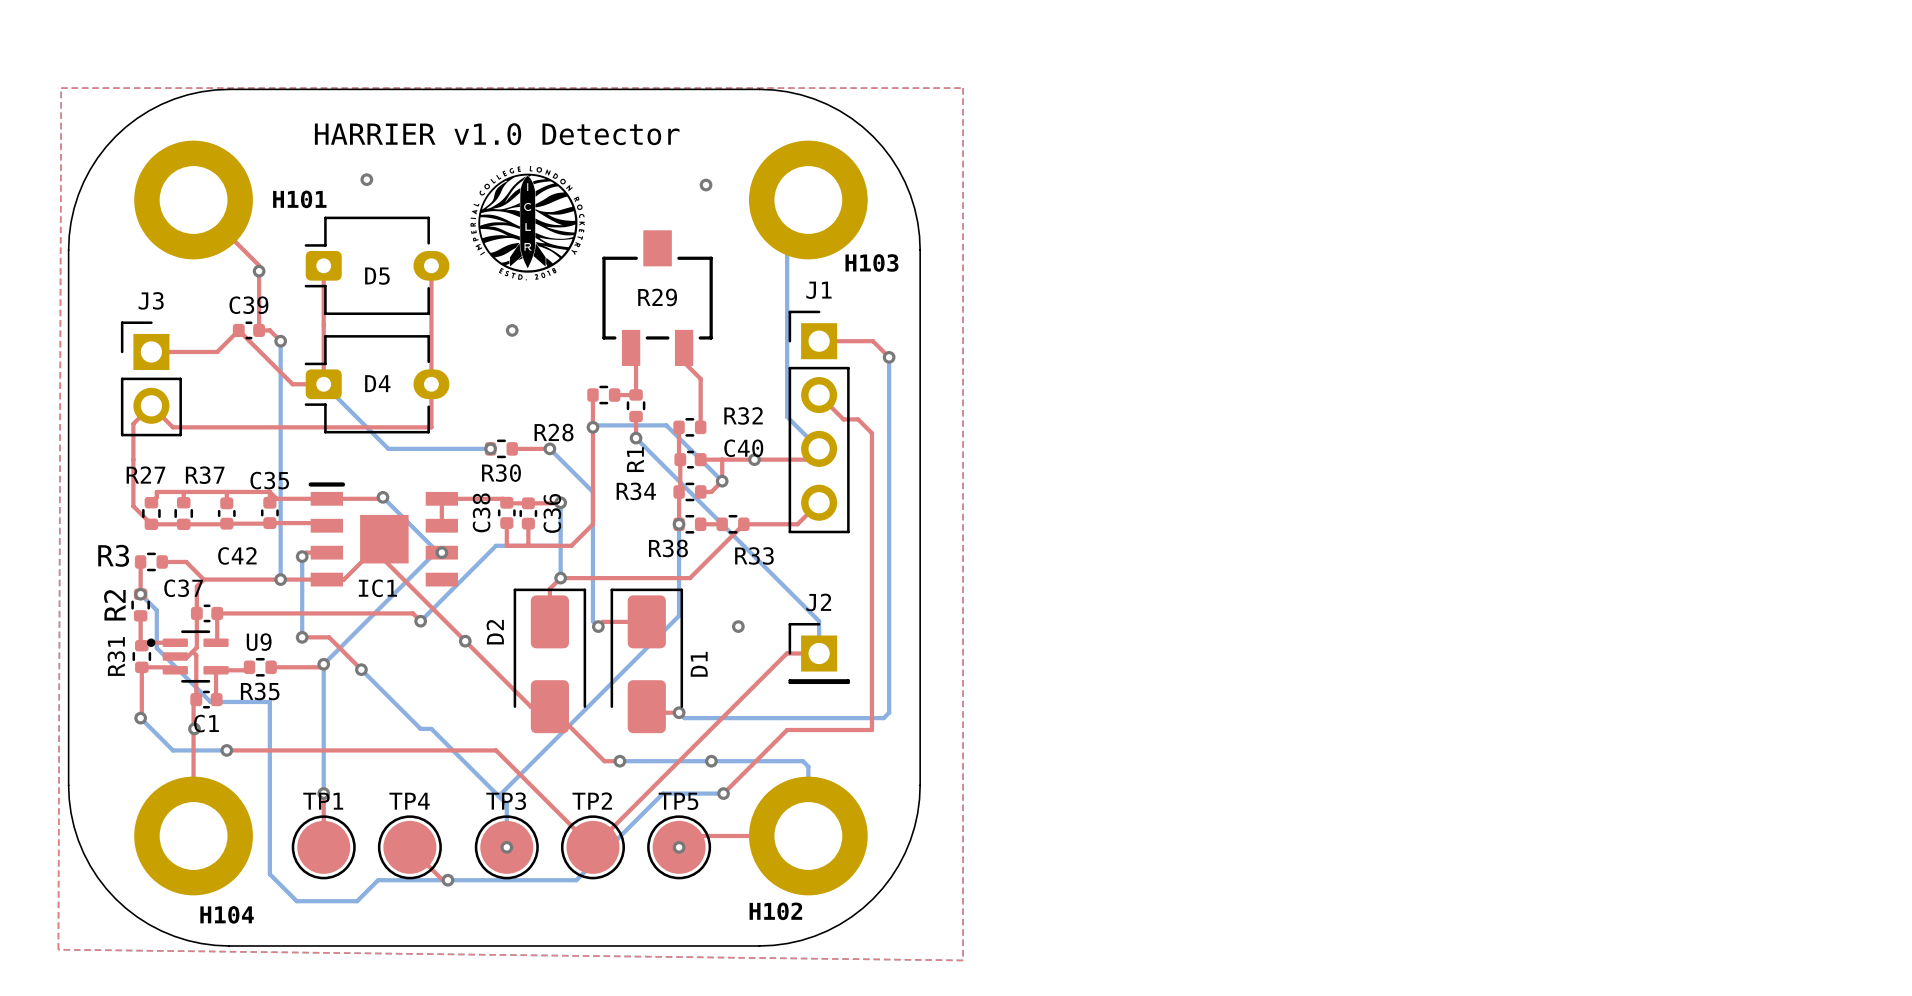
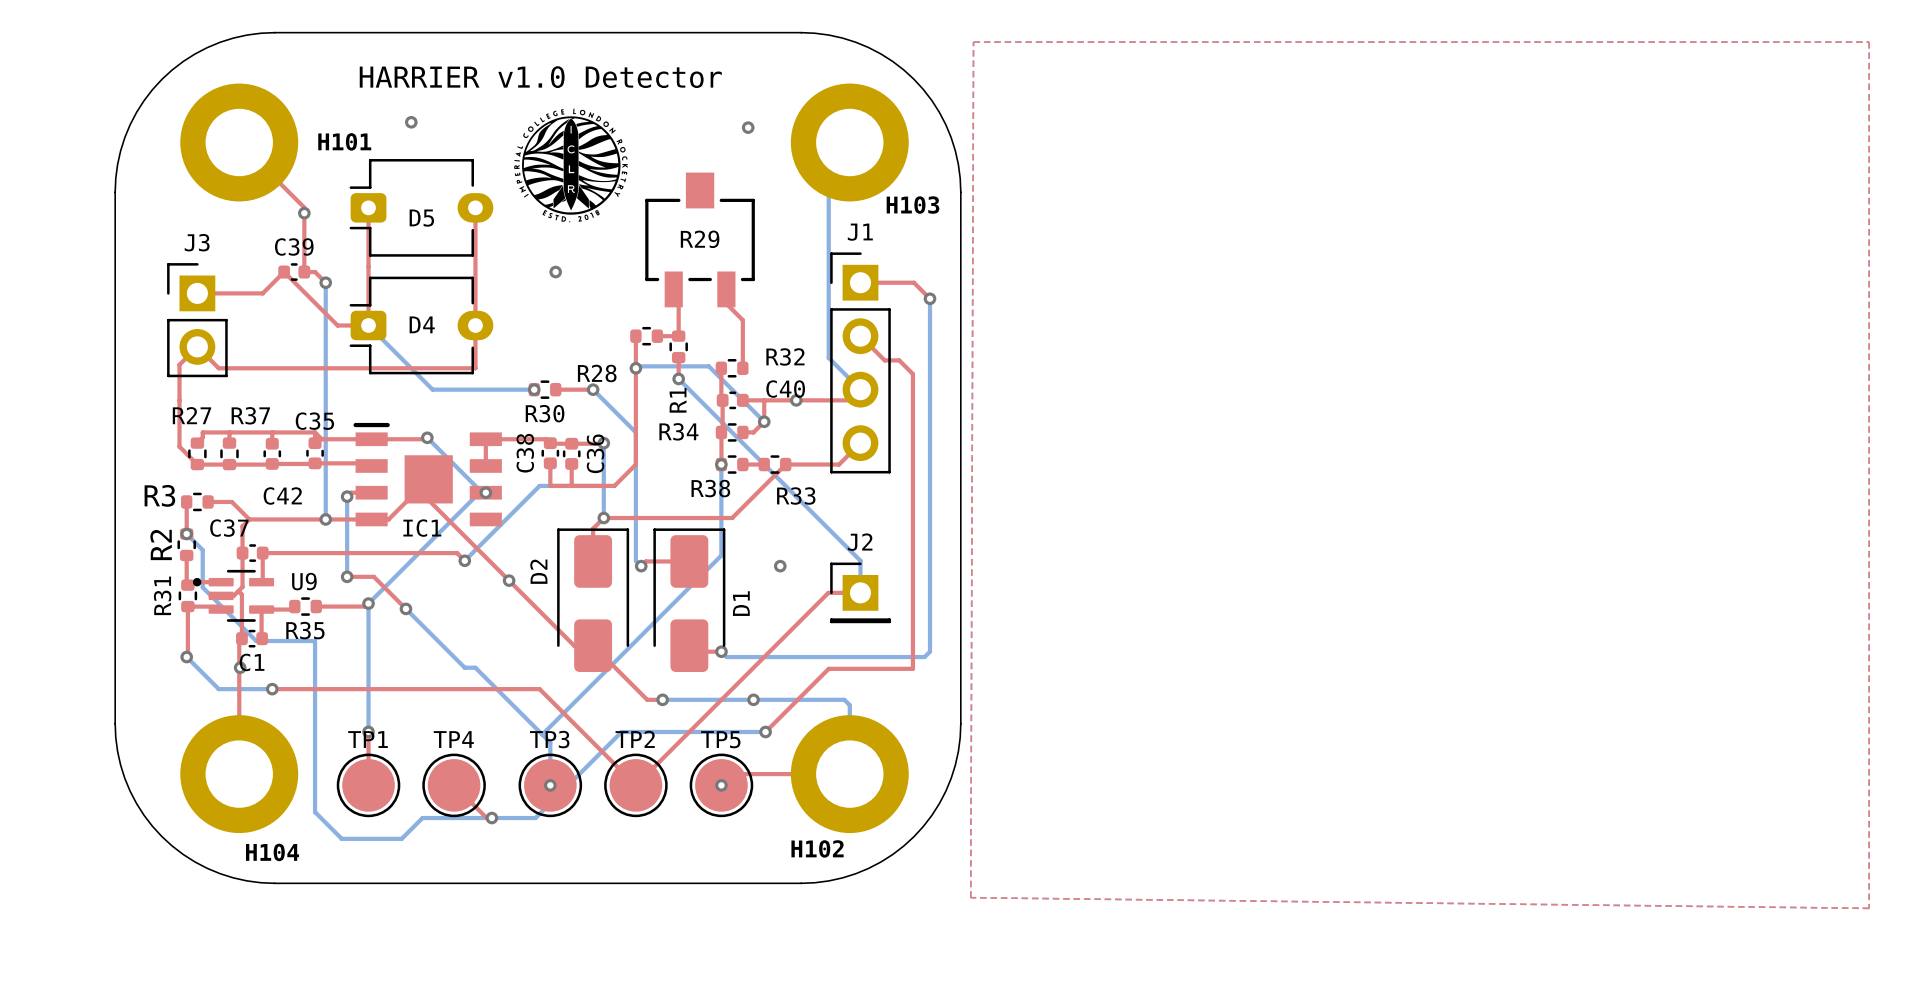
top zone outline: (61, 88) (963, 88) (963, 960) (58, 949) (61, 88) -> none
top zone outline: none -> (973, 42) (1869, 42) (1869, 908) (970, 897) (973, 42)
bottom track: (662, 793) (576, 880) (491, 880) -> (705, 731) (621, 731) (535, 818)

